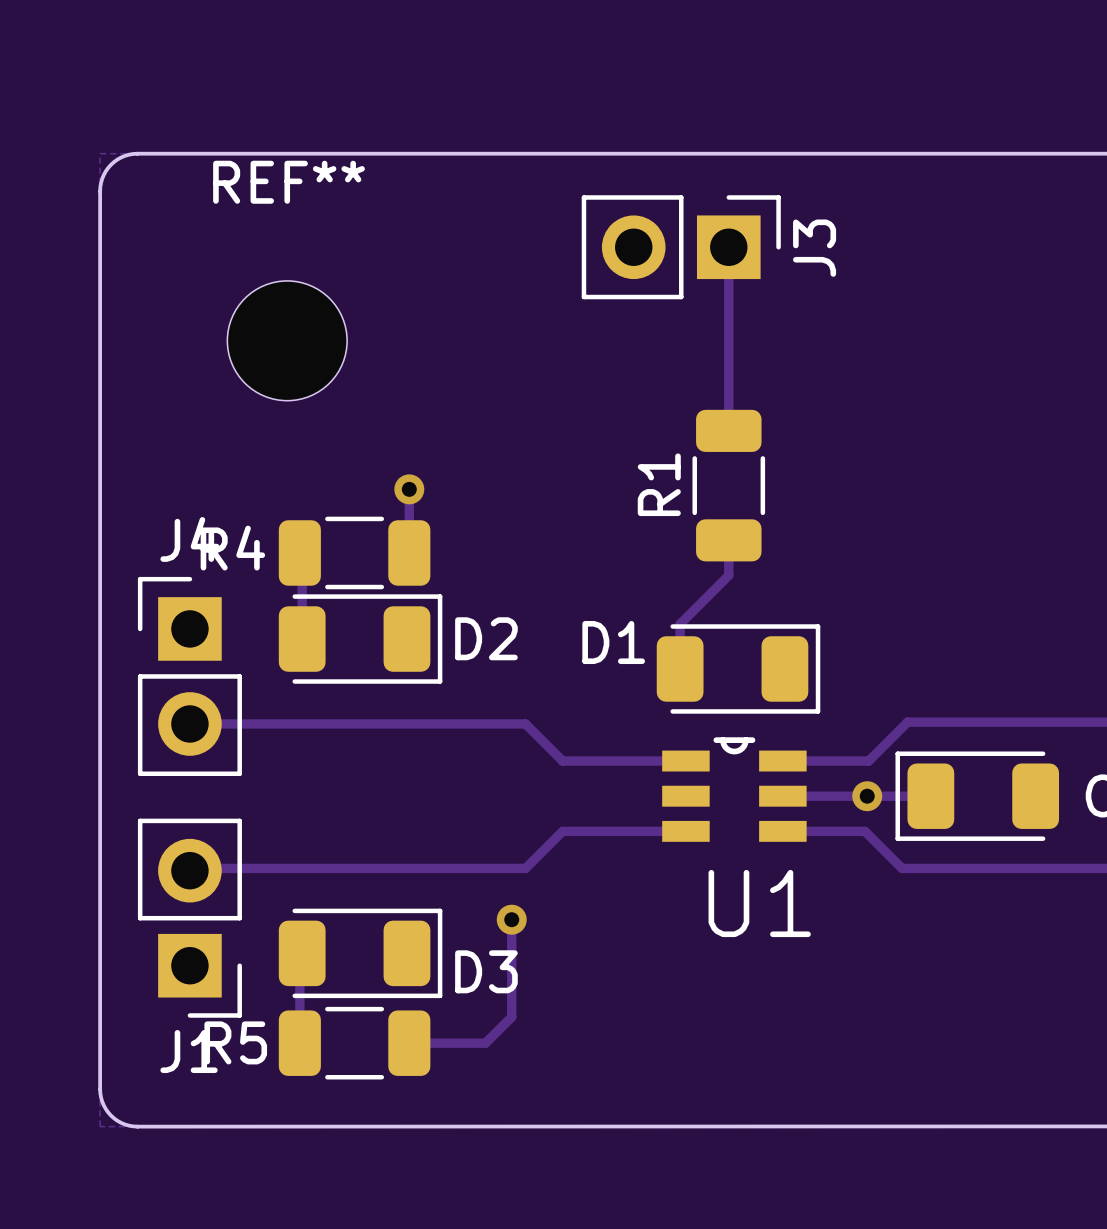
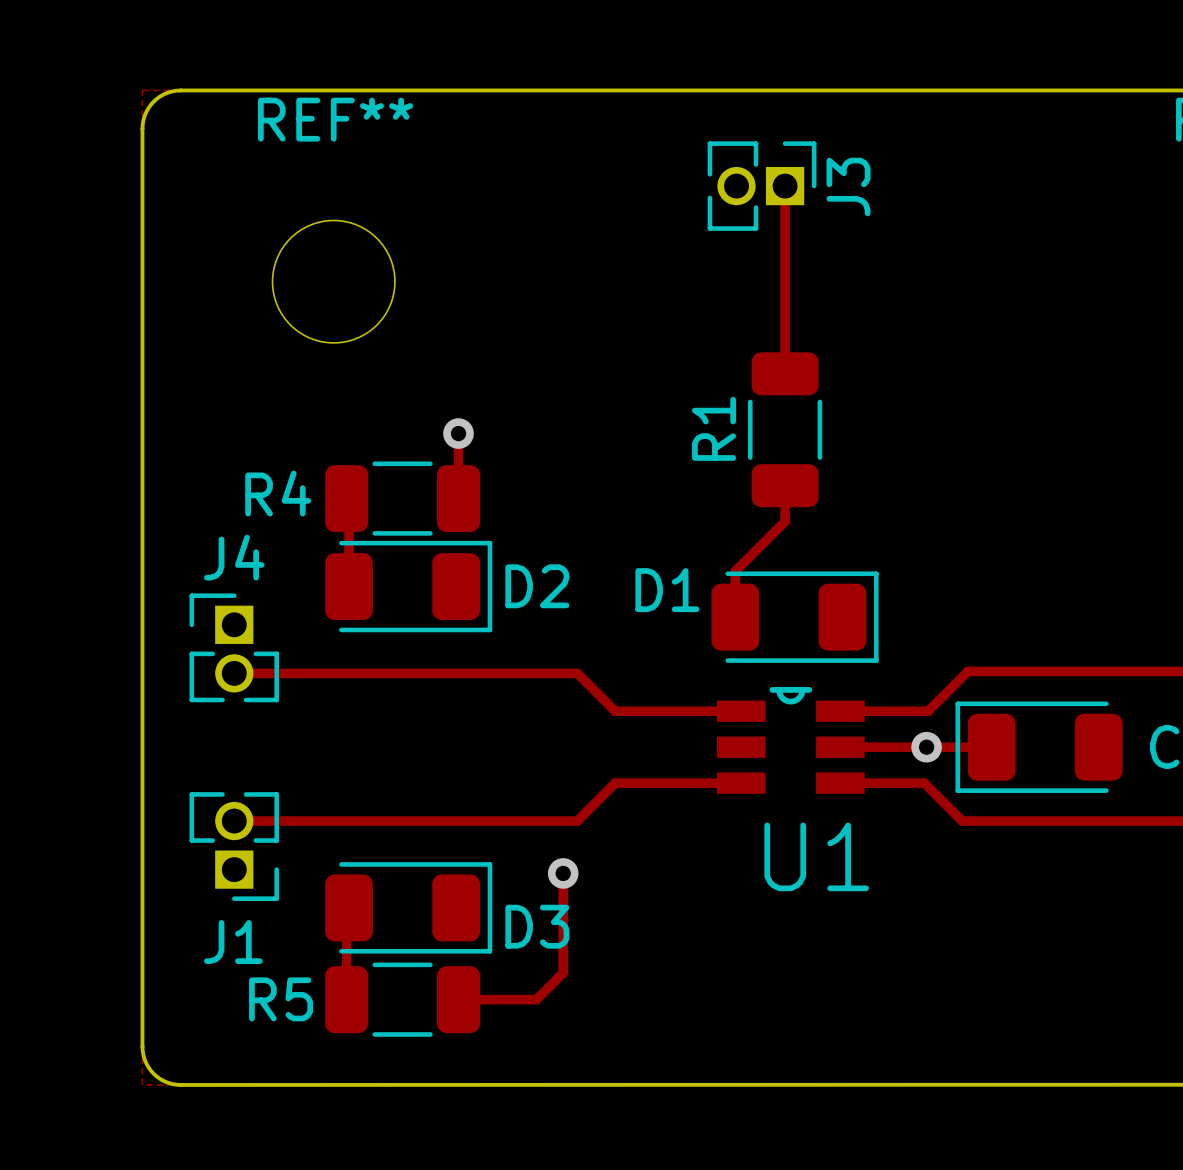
J3 footprint: [581, 195, 781, 300] -> [707, 141, 817, 231]
J4 footprint: [137, 576, 242, 777] -> [189, 593, 280, 703]
J1 footprint: [137, 818, 242, 1018] -> [189, 792, 280, 901]

